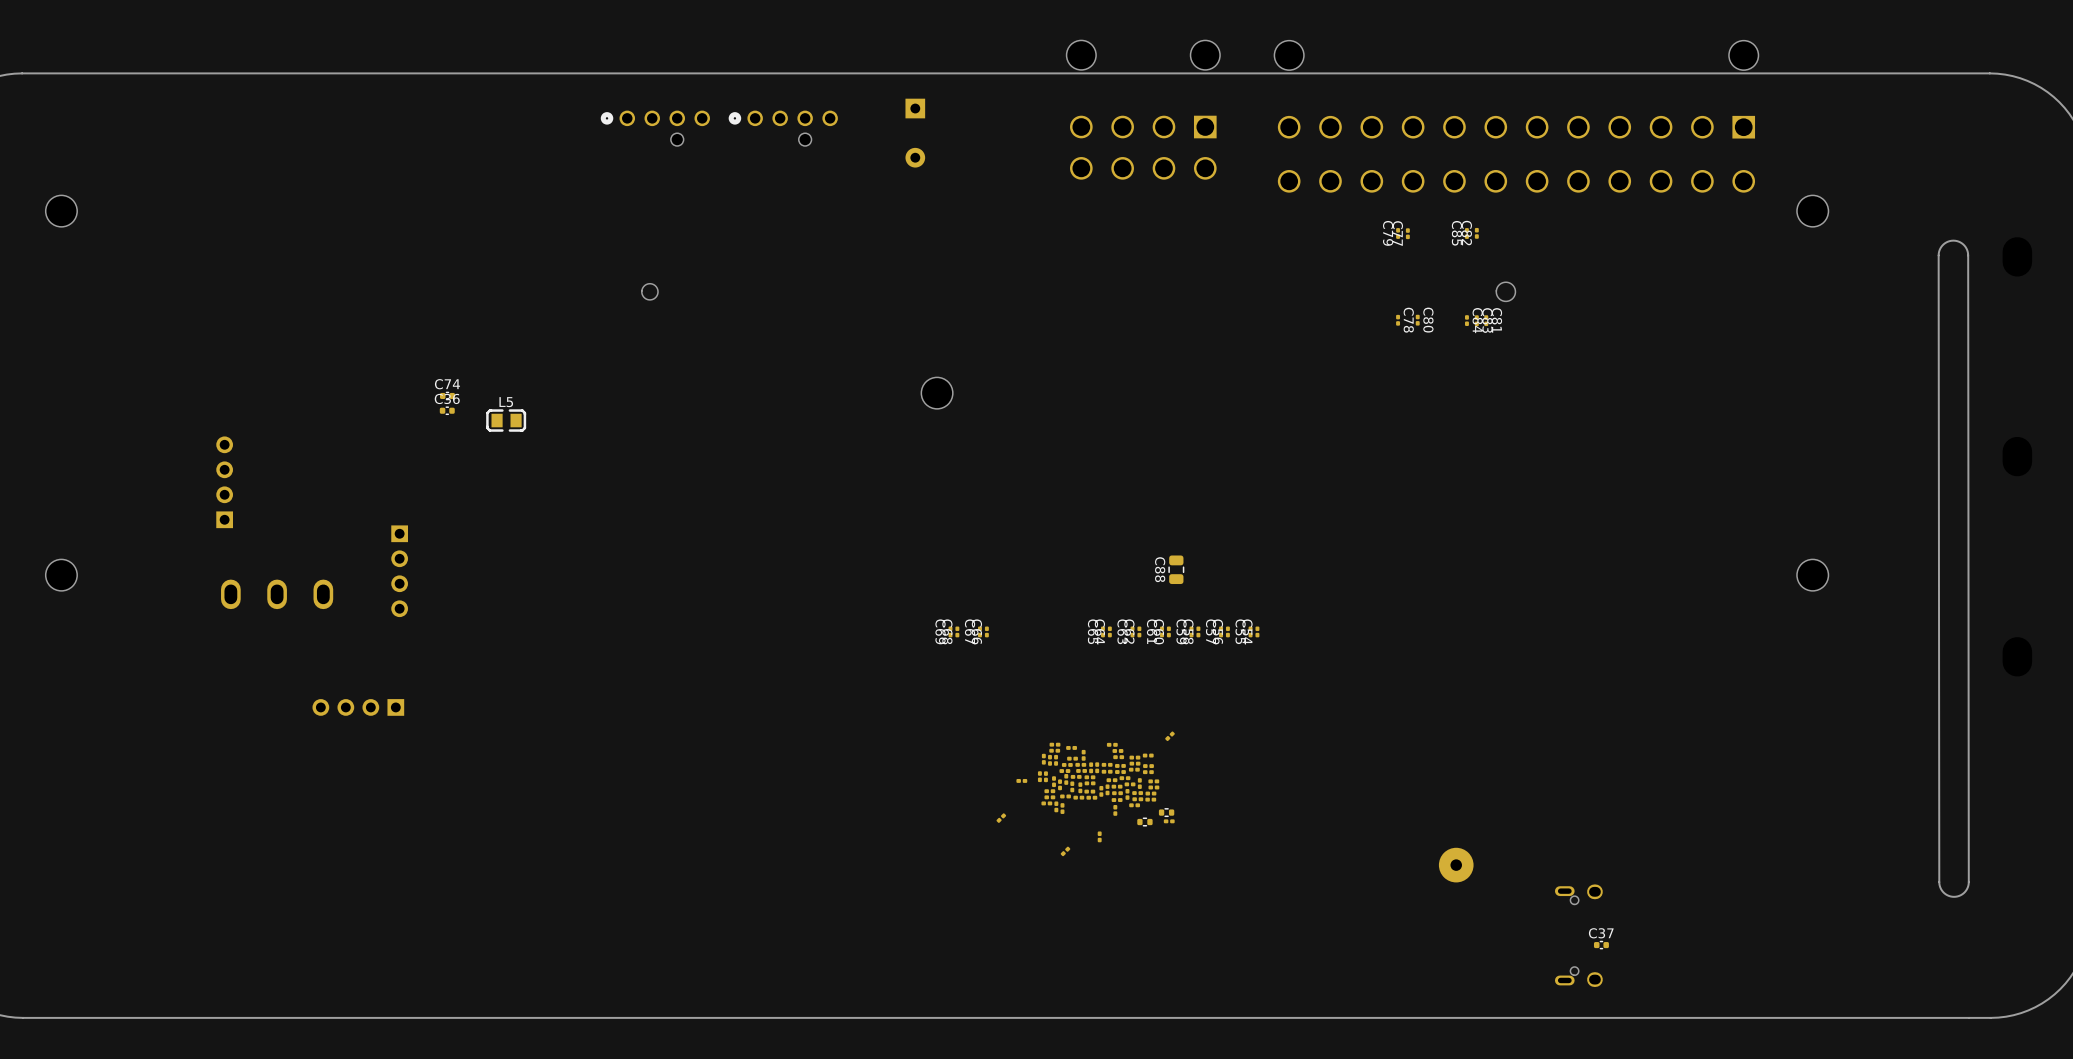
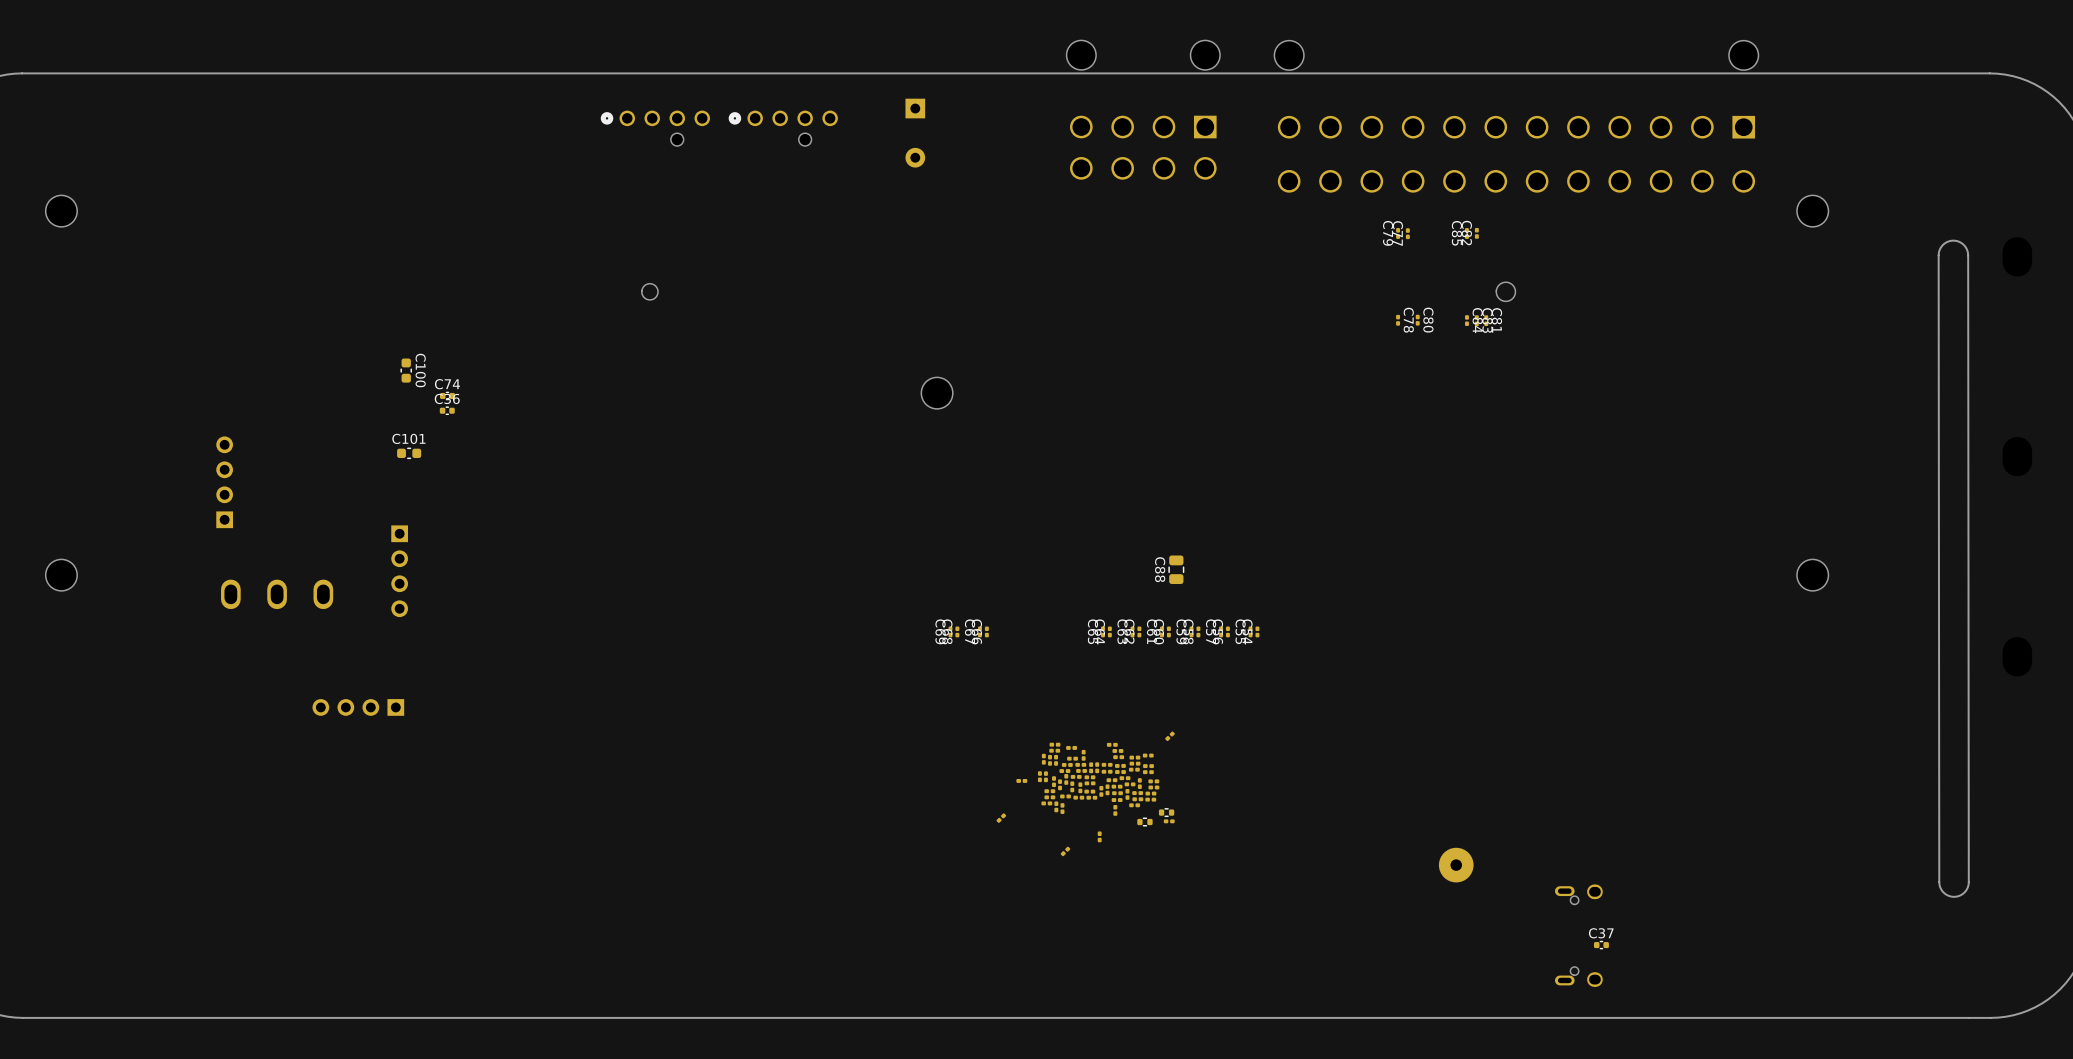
C100: none -> (406, 370)
L5: (506, 420) -> none
C101: none -> (409, 453)

